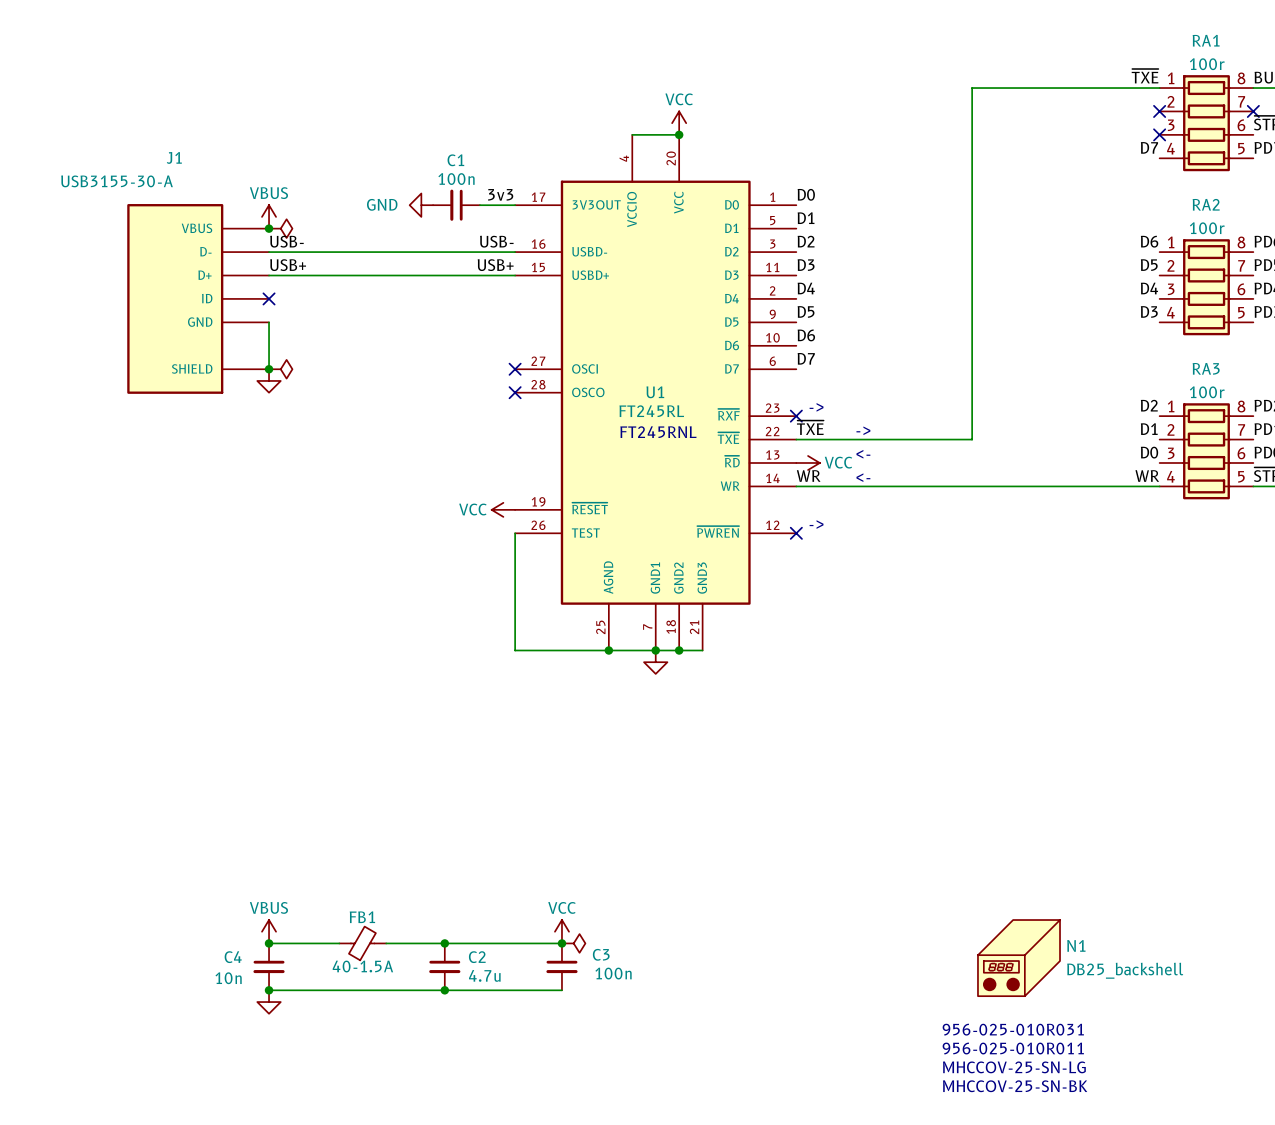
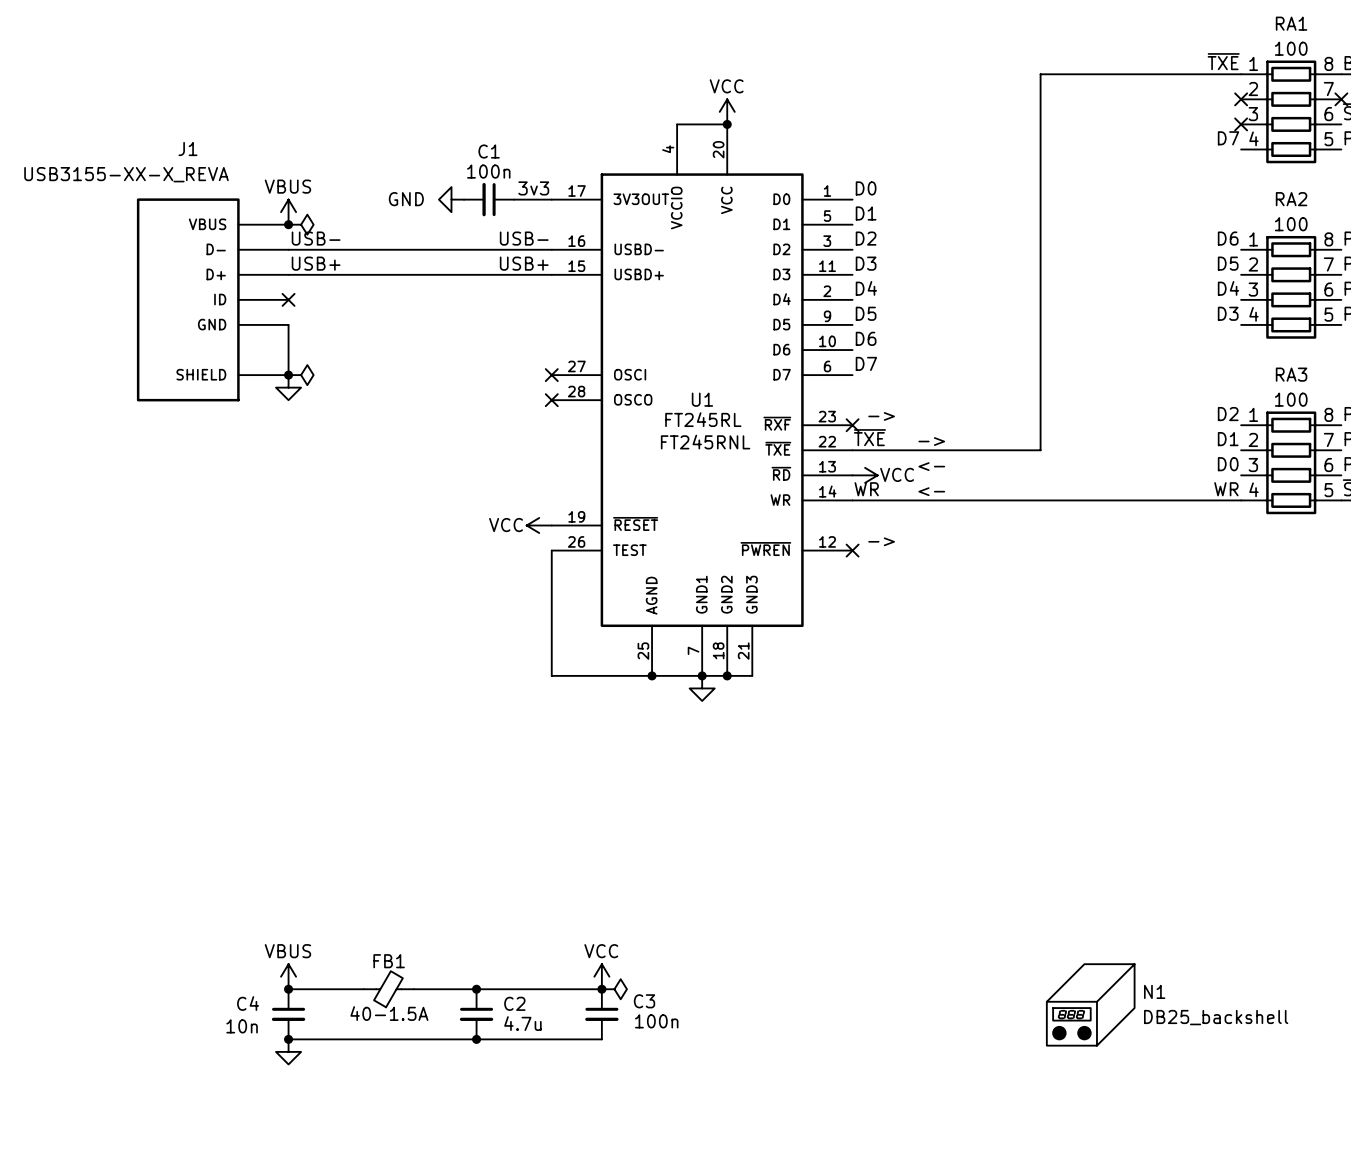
RA1 value: 100r (1207, 64) -> 100 (1291, 48)
J1 value: USB3155-30-A (117, 181) -> USB3155-XX-X_REVA (126, 174)
RA2 value: 100r (1207, 228) -> 100 (1291, 224)
RA3 value: 100r (1207, 392) -> 100 (1291, 399)
text: 956-025-010R031 (1013, 1029) -> none
text: 956-025-010R011 (1013, 1048) -> none
text: MHCCOV-25-SN-LG (1014, 1067) -> none
text: MHCCOV-25-SN-BK (1015, 1086) -> none

